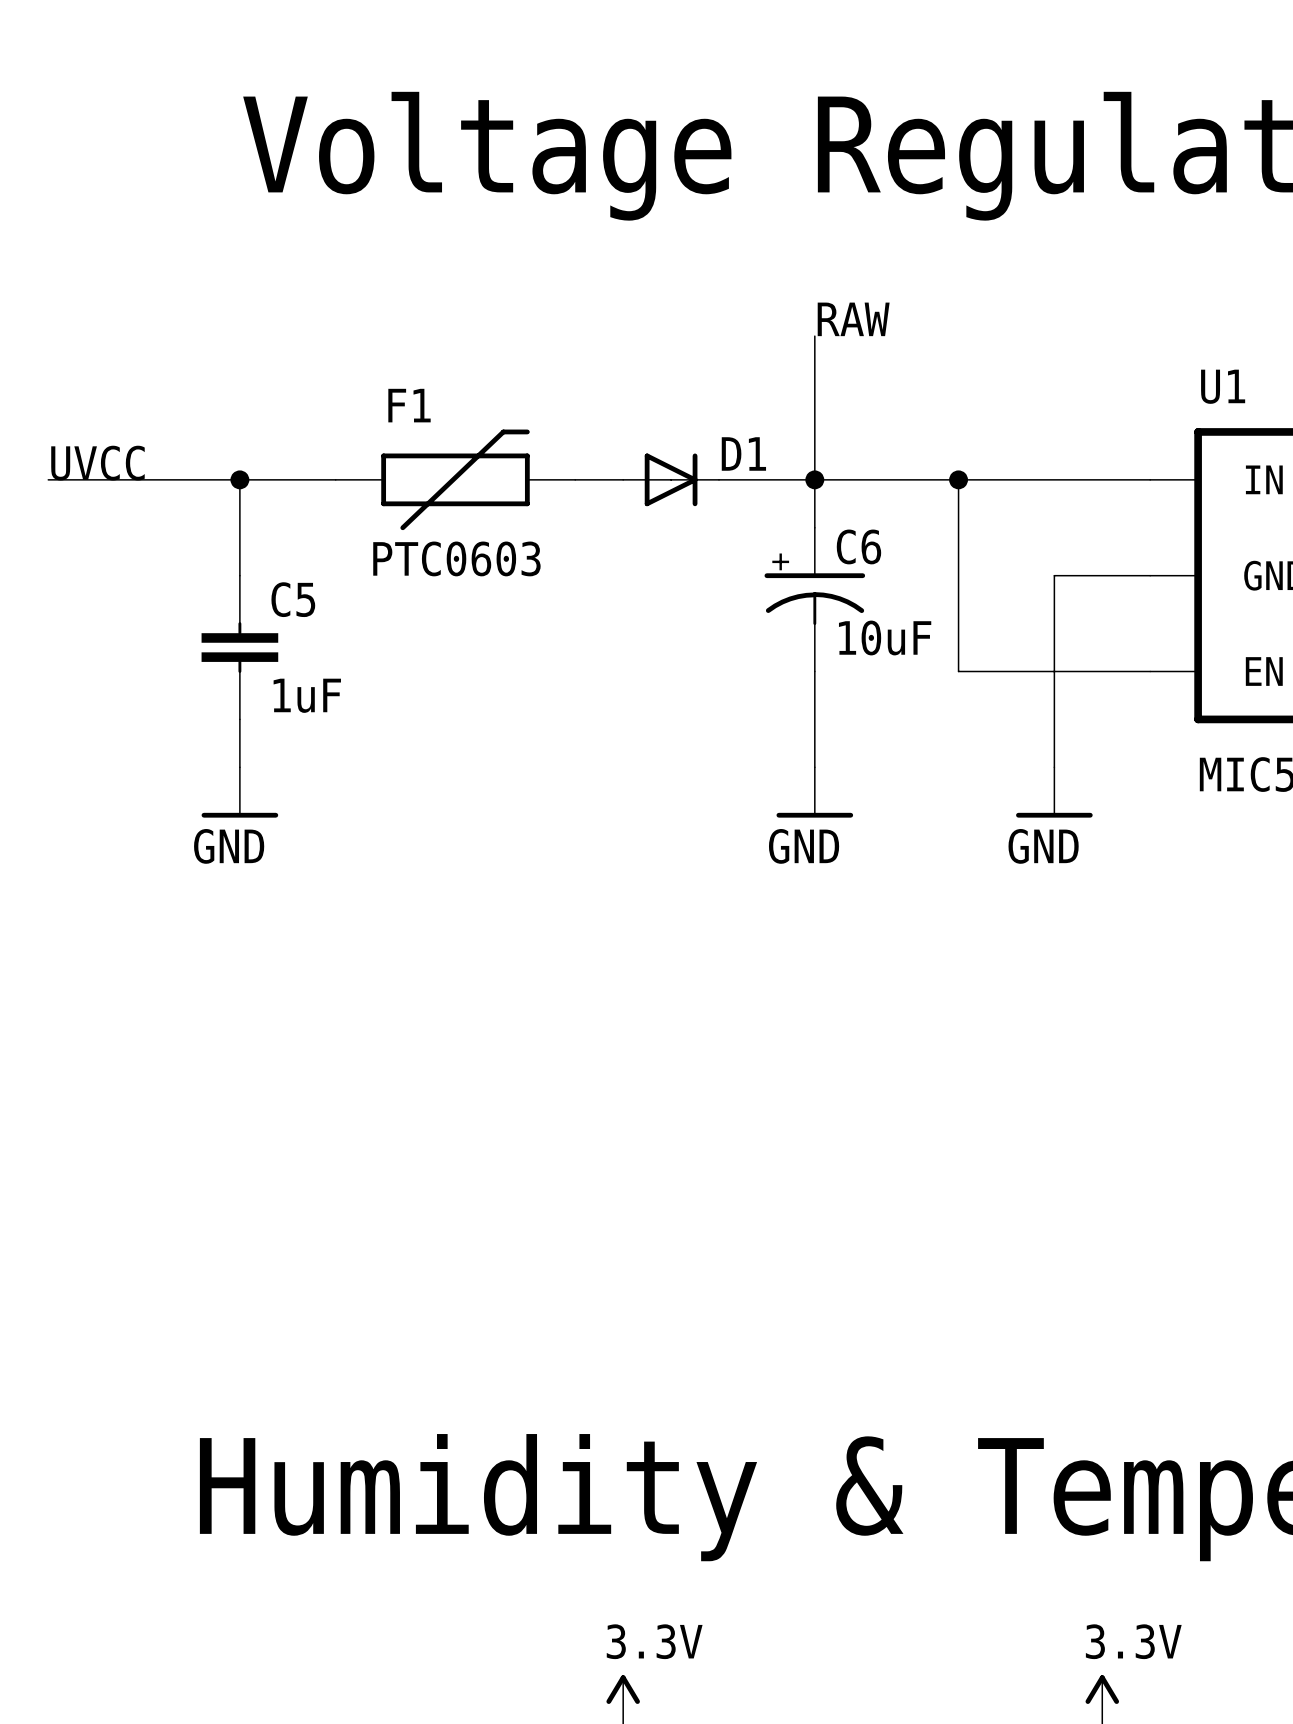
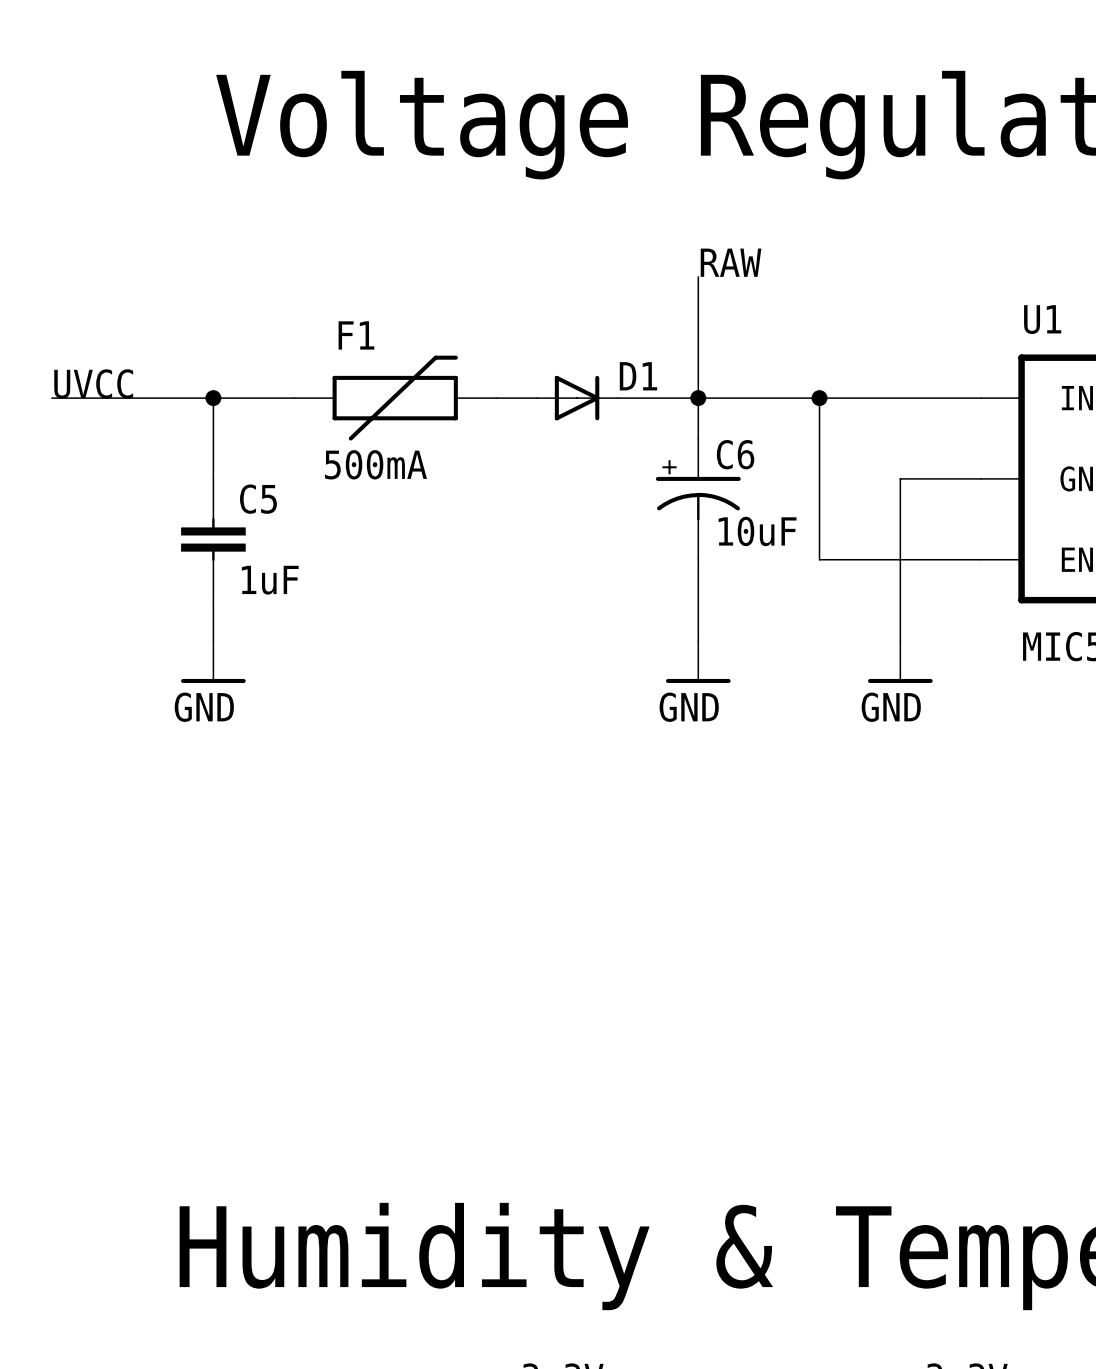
F1 value: PTC0603 (456, 558) -> 500mA (375, 464)

